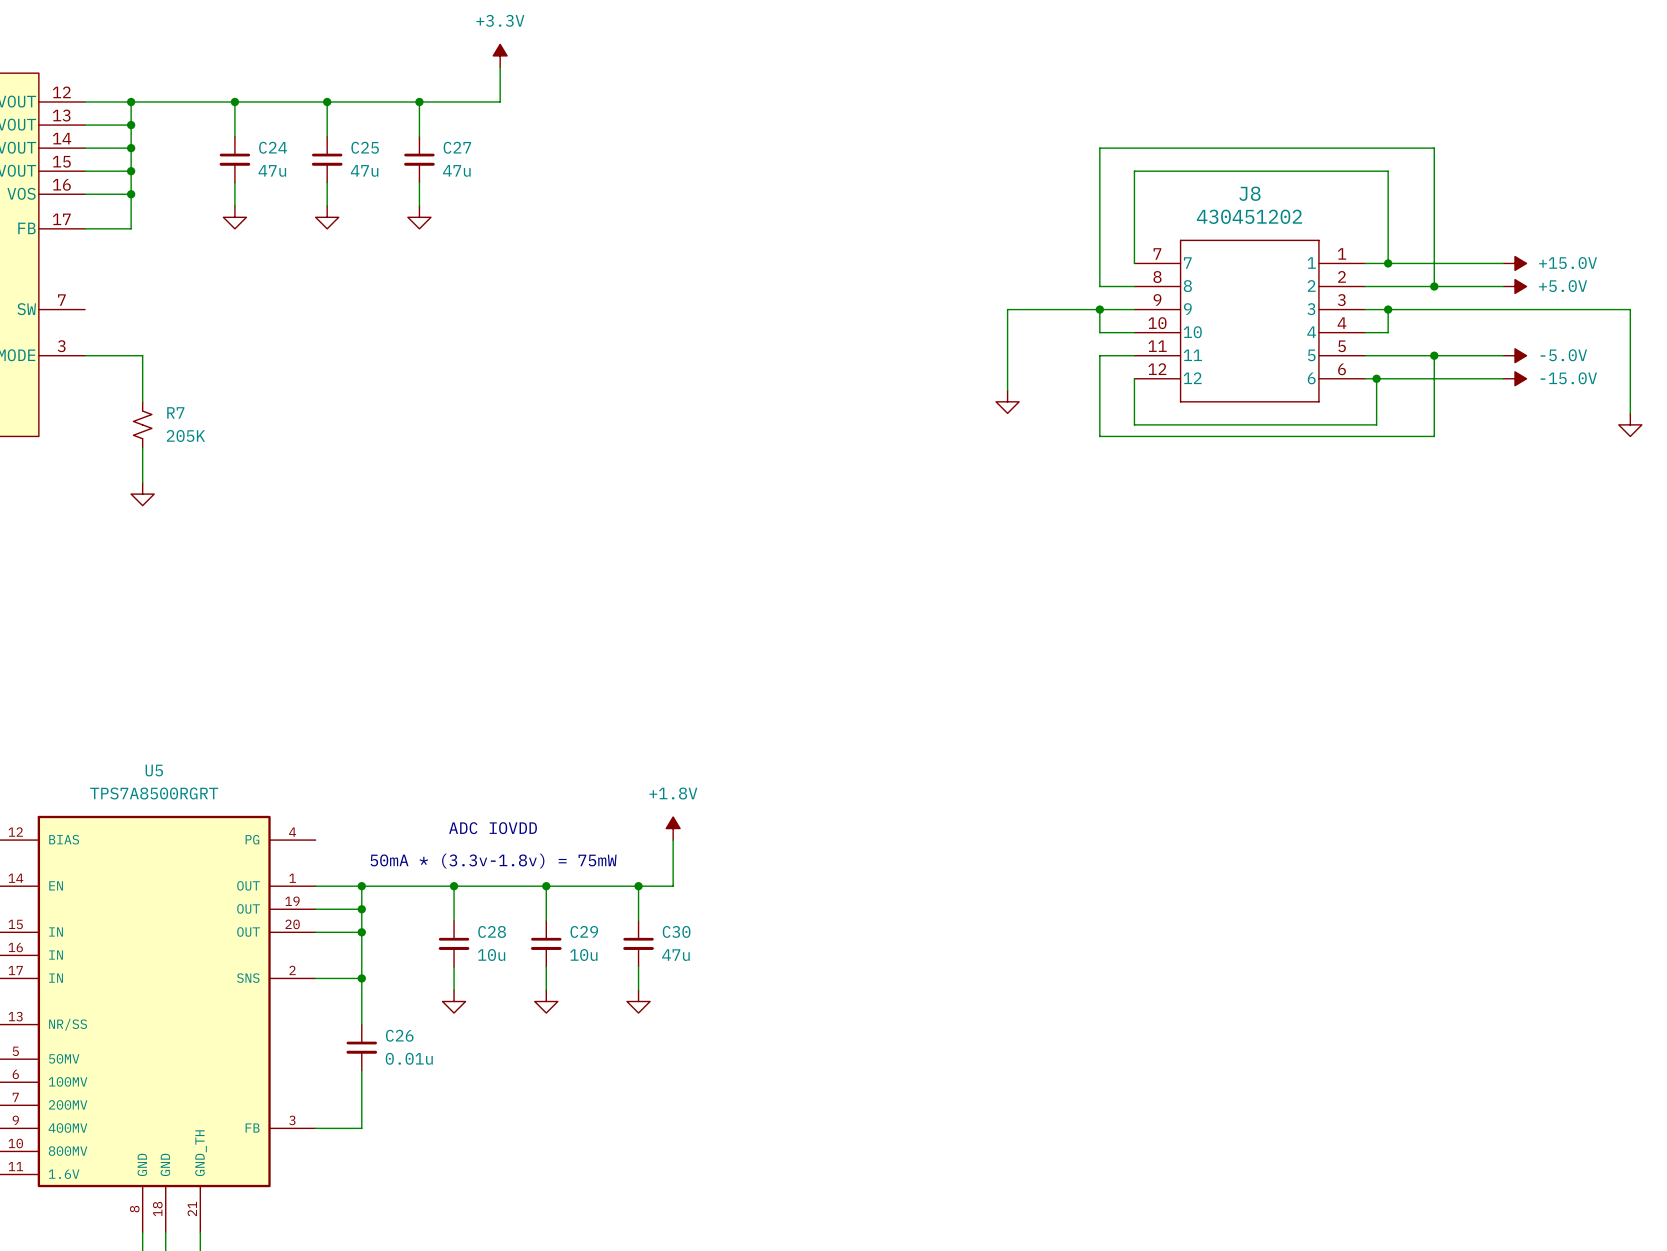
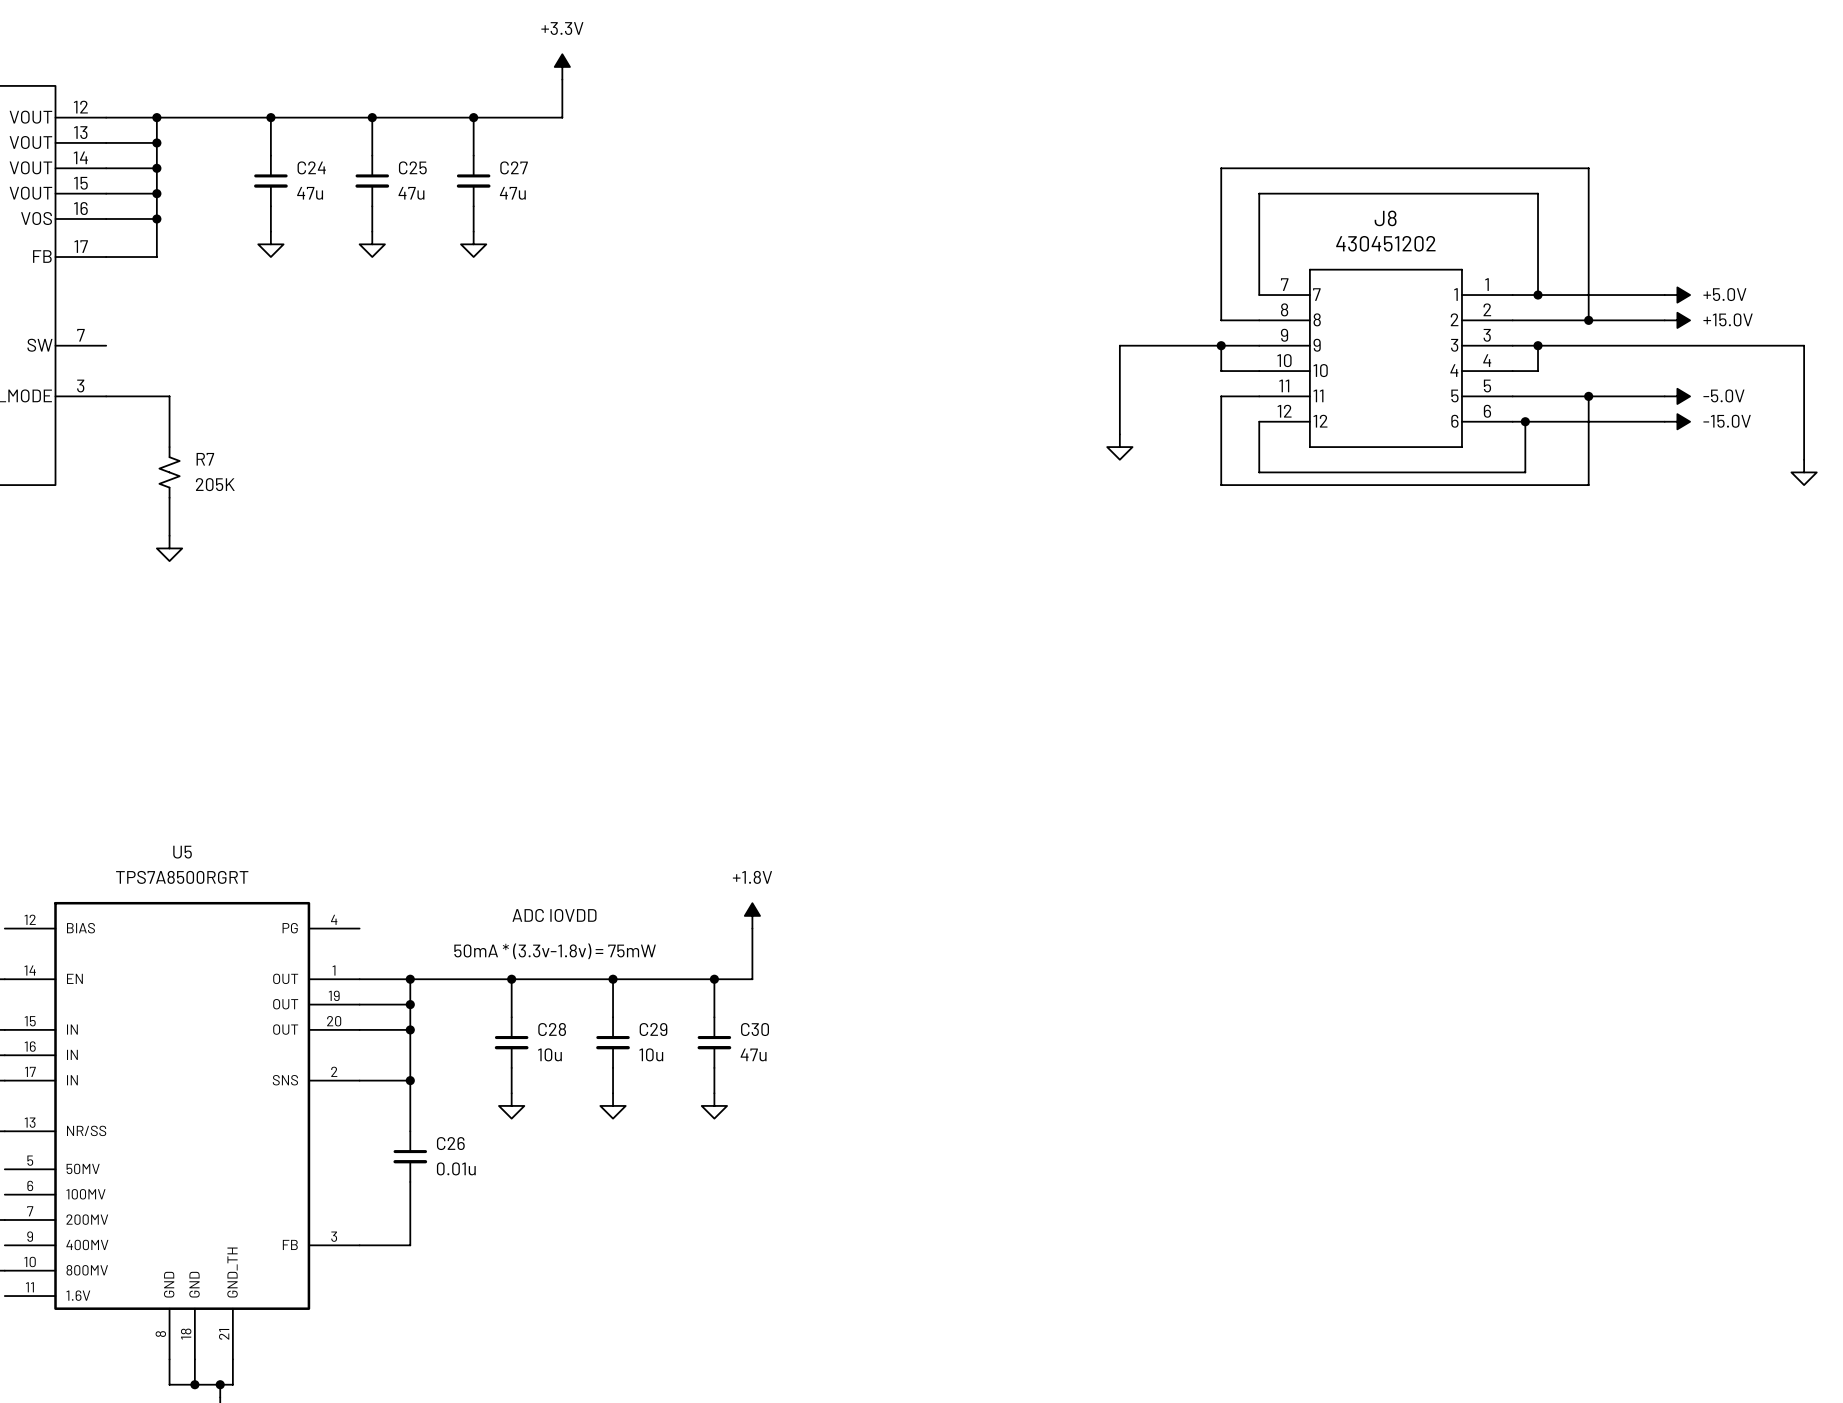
power symbol: +15.0V (1515, 263) -> +5.0V (1677, 295)
power symbol: +5.0V (1515, 286) -> +15.0V (1677, 320)

